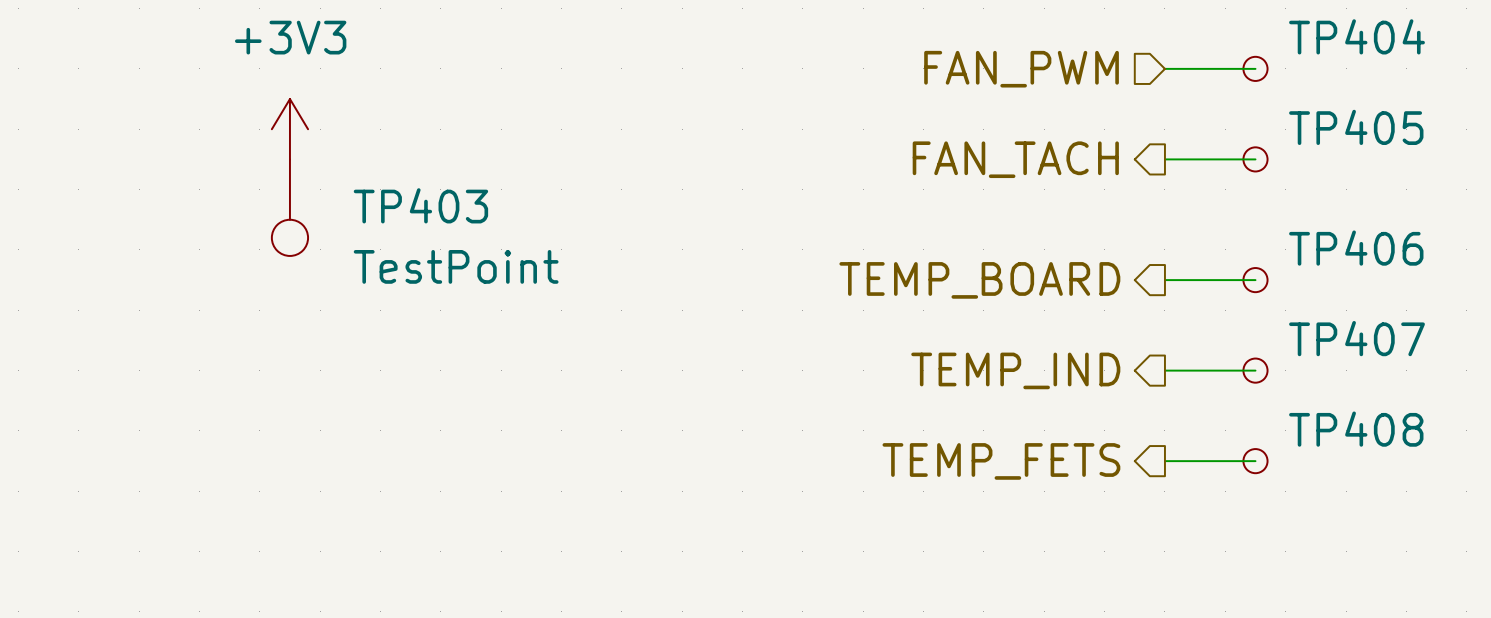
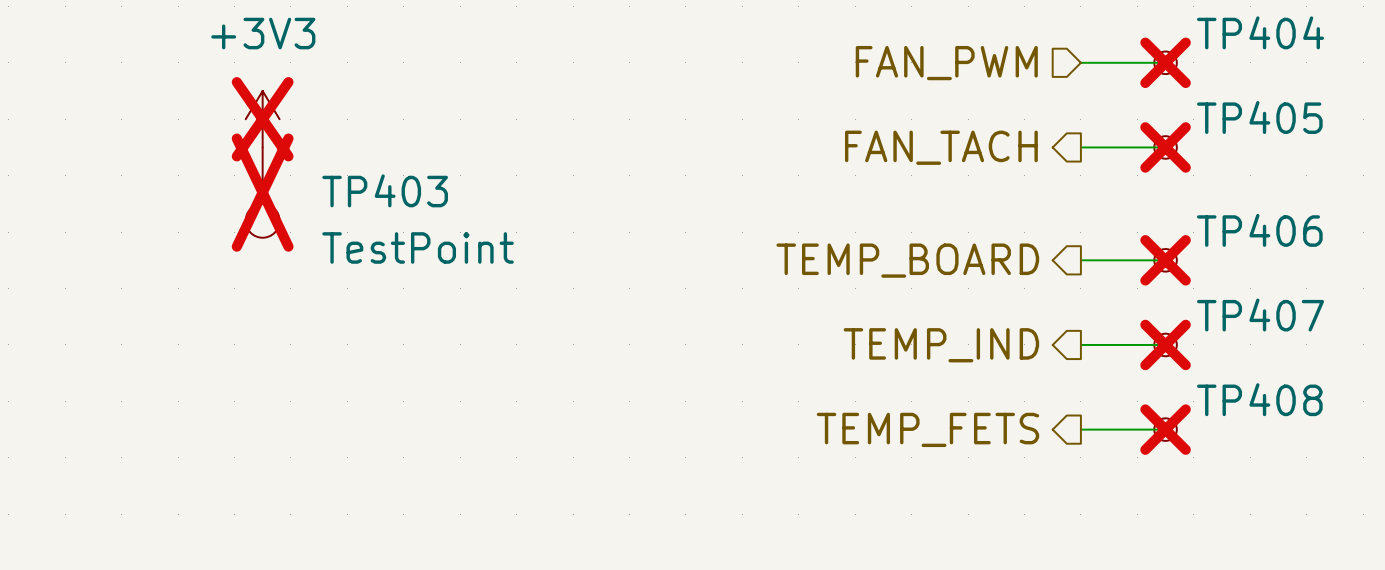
TP404 do-not-place cross: none -> (1165, 62)
power symbol do-not-place cross: none -> (262, 119)
TP405 do-not-place cross: none -> (1165, 147)
TP403 do-not-place cross: none -> (262, 192)
TP406 do-not-place cross: none -> (1165, 260)
TP407 do-not-place cross: none -> (1165, 344)
TP408 do-not-place cross: none -> (1165, 429)

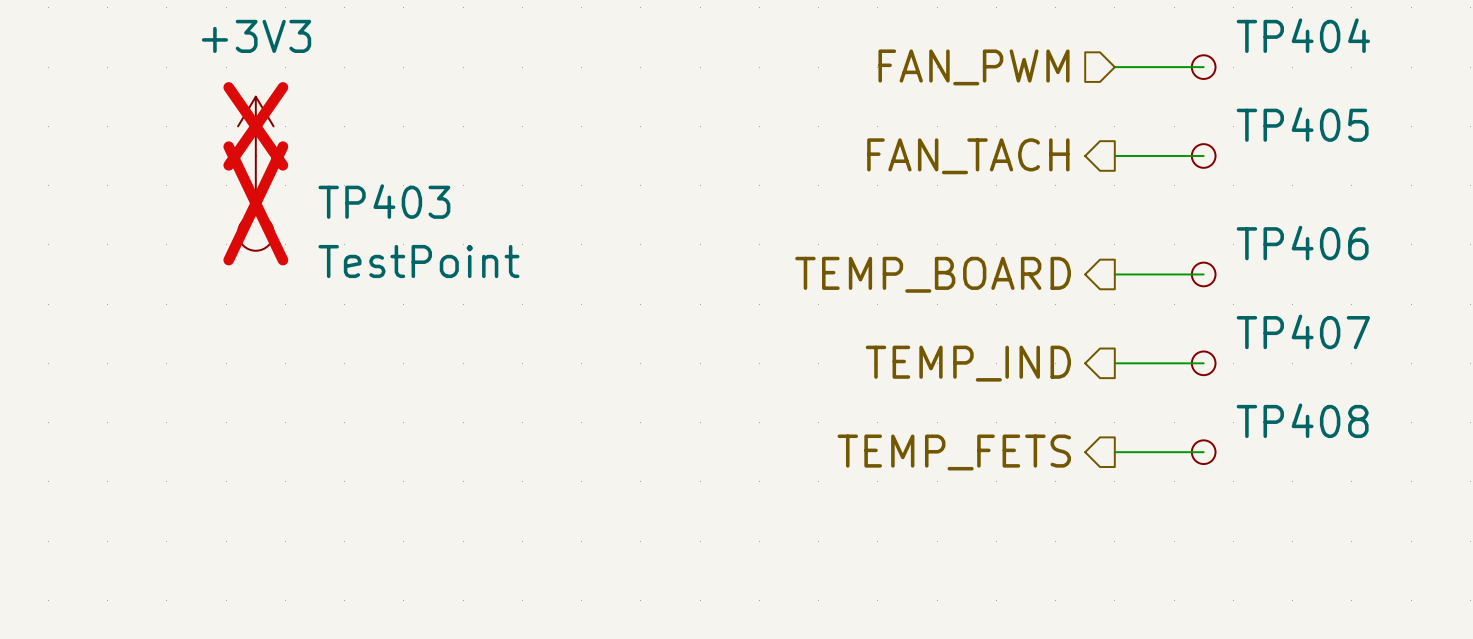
TP404 do-not-place cross: (1165, 62) -> none
TP405 do-not-place cross: (1165, 147) -> none
TP406 do-not-place cross: (1165, 260) -> none
TP407 do-not-place cross: (1165, 344) -> none
TP408 do-not-place cross: (1165, 429) -> none

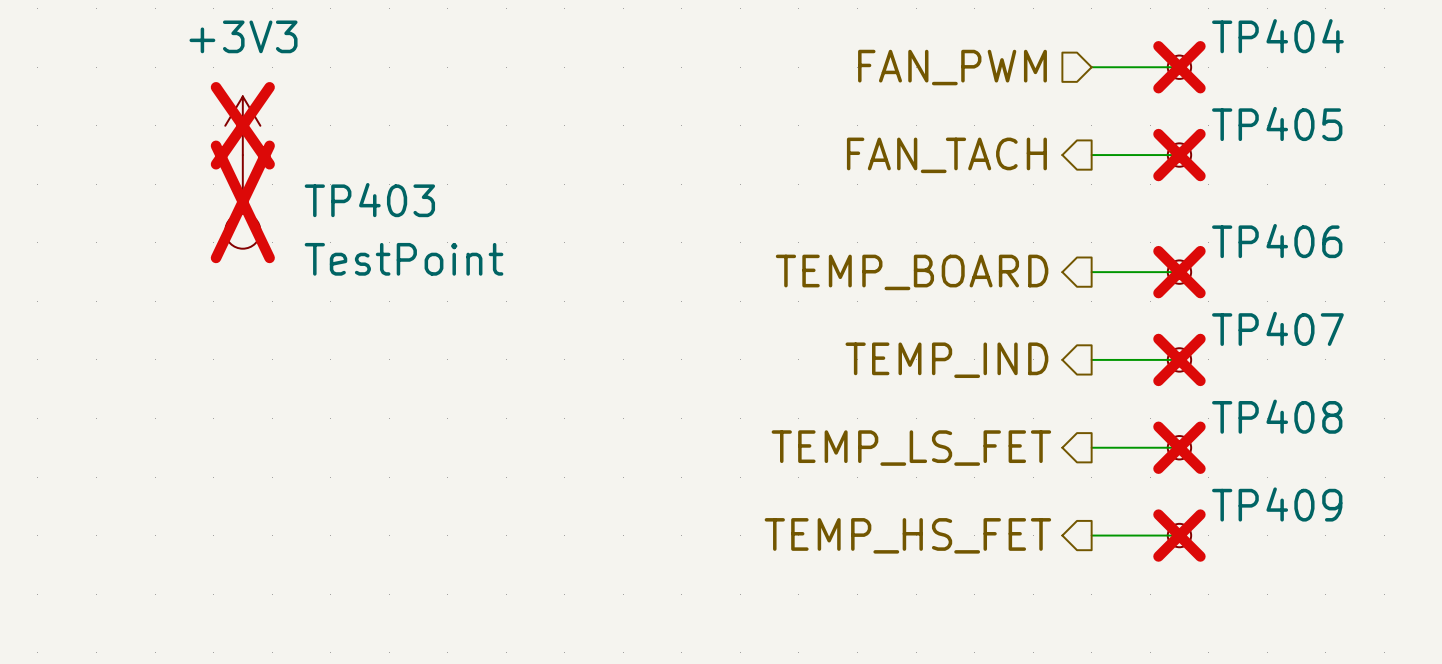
TP404 do-not-place cross: none -> (1179, 67)
TP405 do-not-place cross: none -> (1179, 155)
TP406 do-not-place cross: none -> (1179, 272)
TP407 do-not-place cross: none -> (1179, 359)
hierarchical label: TEMP_FETS (954, 452) -> TEMP_LS_FET (911, 448)
TP408 do-not-place cross: none -> (1179, 447)
hierarchical label: none -> TEMP_HS_FET (907, 535)
wire: none -> (1091, 535) (1179, 535)
TP409: none -> (1179, 535)

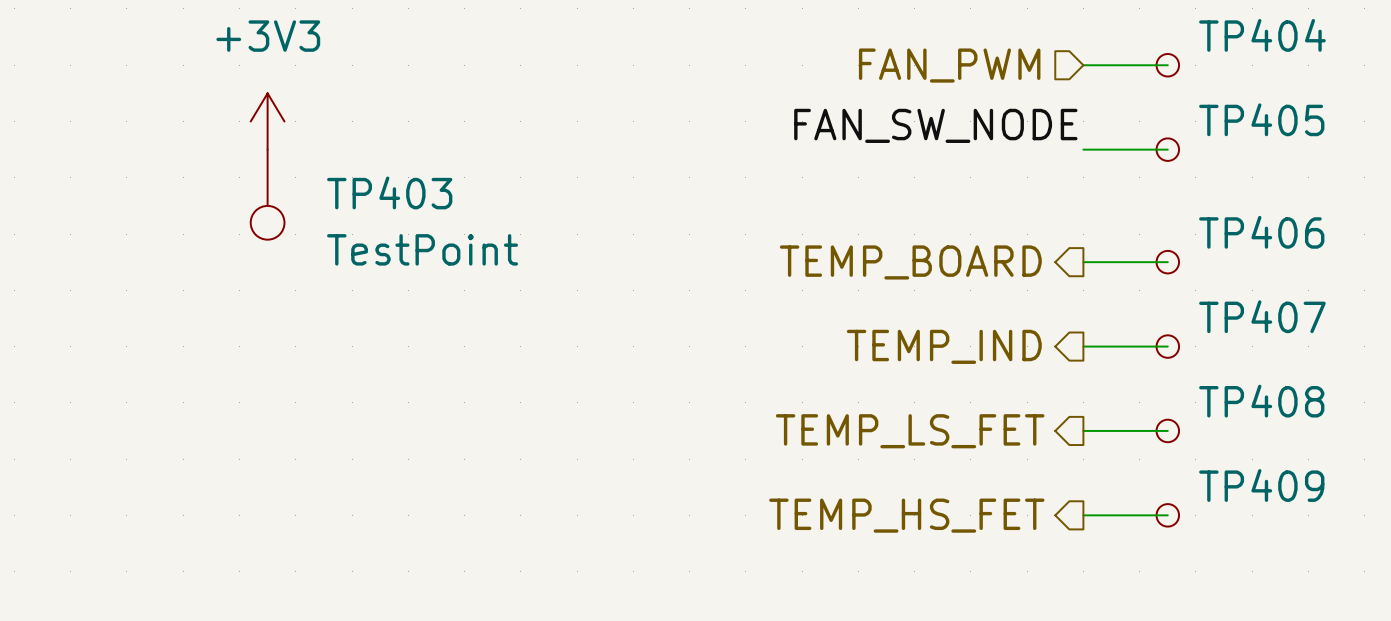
TP404 do-not-place cross: (1179, 67) -> none
power symbol do-not-place cross: (242, 125) -> none
label: none -> FAN_SW_NODE (935, 125)
hierarchical label: FAN_TACH (946, 155) -> none
TP405 do-not-place cross: (1179, 155) -> none
TP403 do-not-place cross: (242, 201) -> none
TP406 do-not-place cross: (1179, 272) -> none
TP407 do-not-place cross: (1179, 359) -> none
TP408 do-not-place cross: (1179, 447) -> none
TP409 do-not-place cross: (1179, 535) -> none

